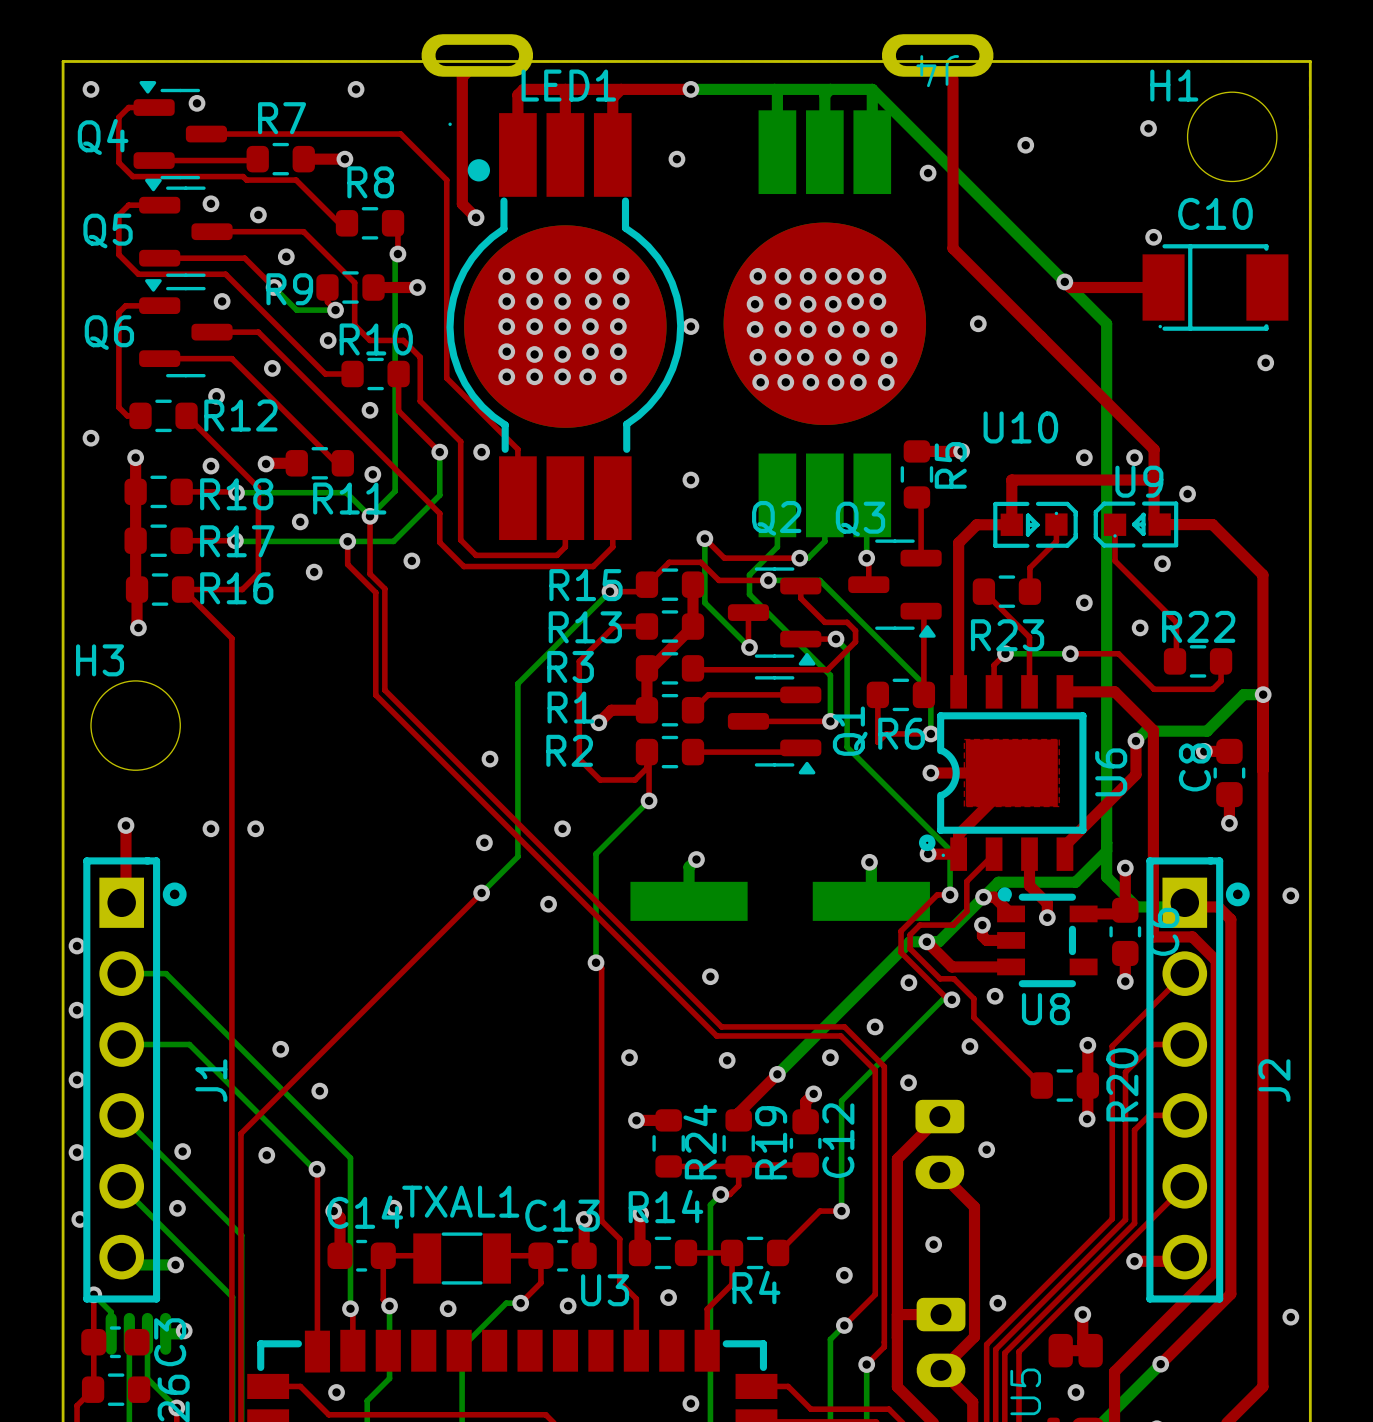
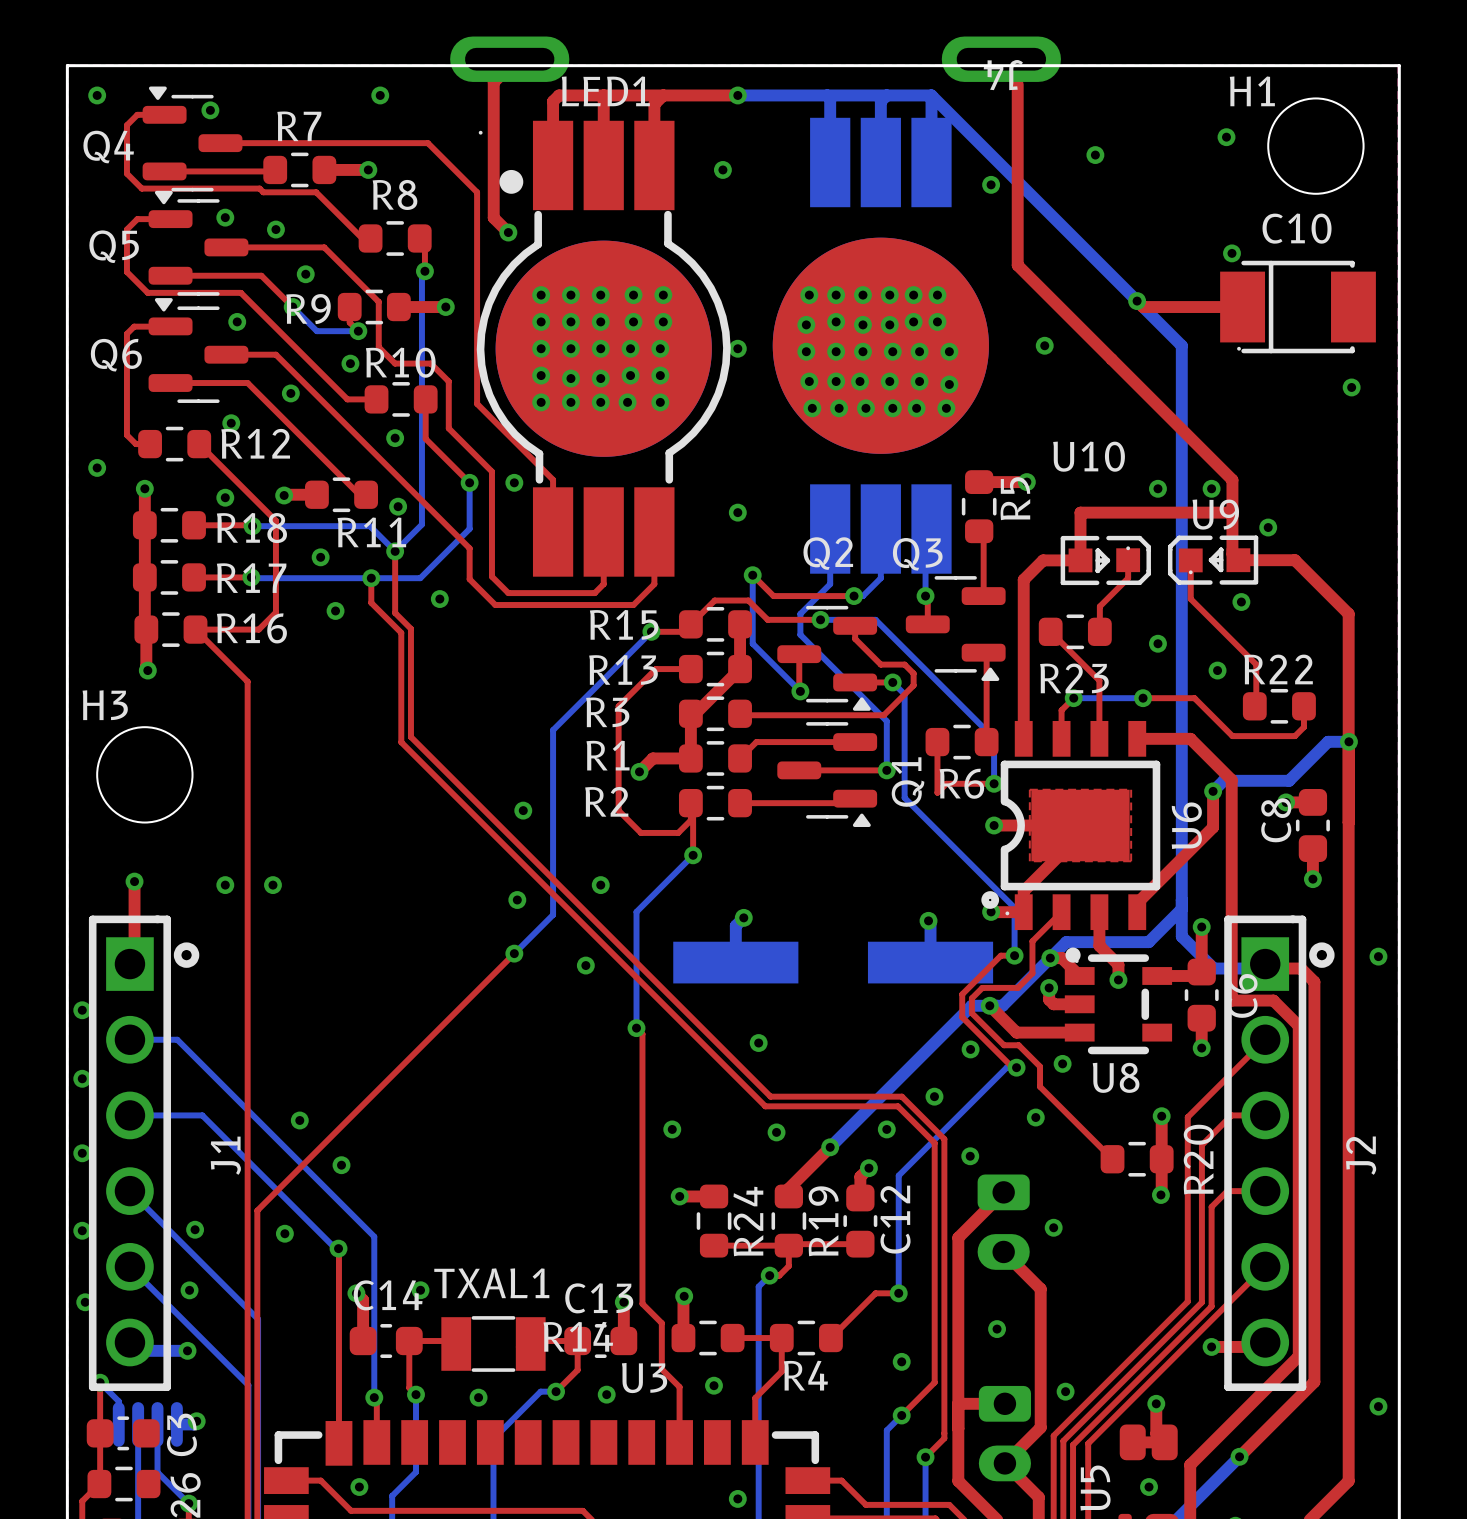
R14 name position: R14 (665, 1206) -> R14 (578, 1336)

